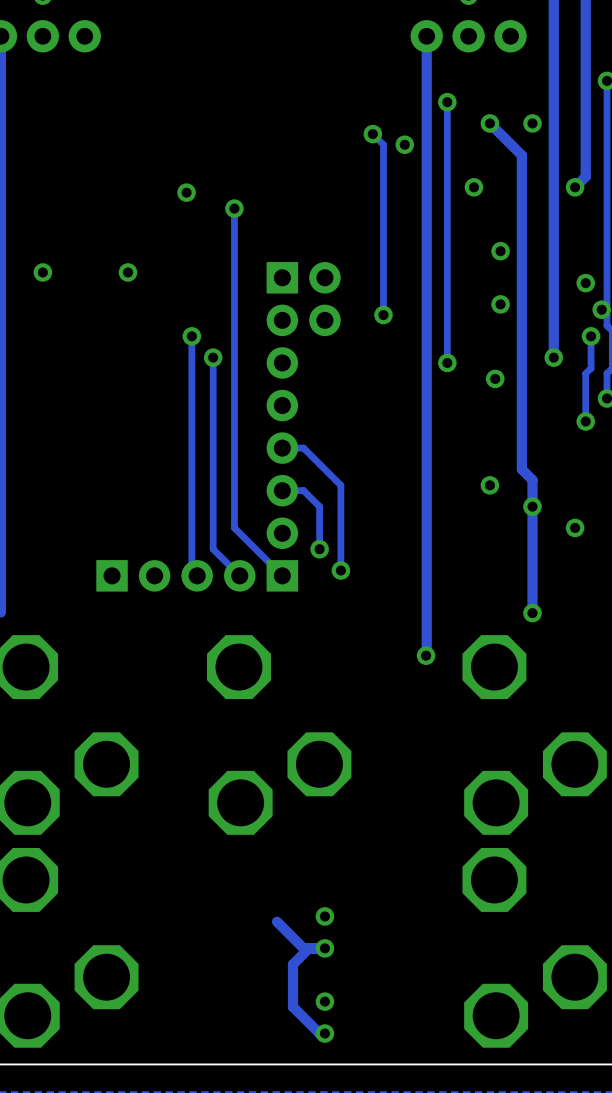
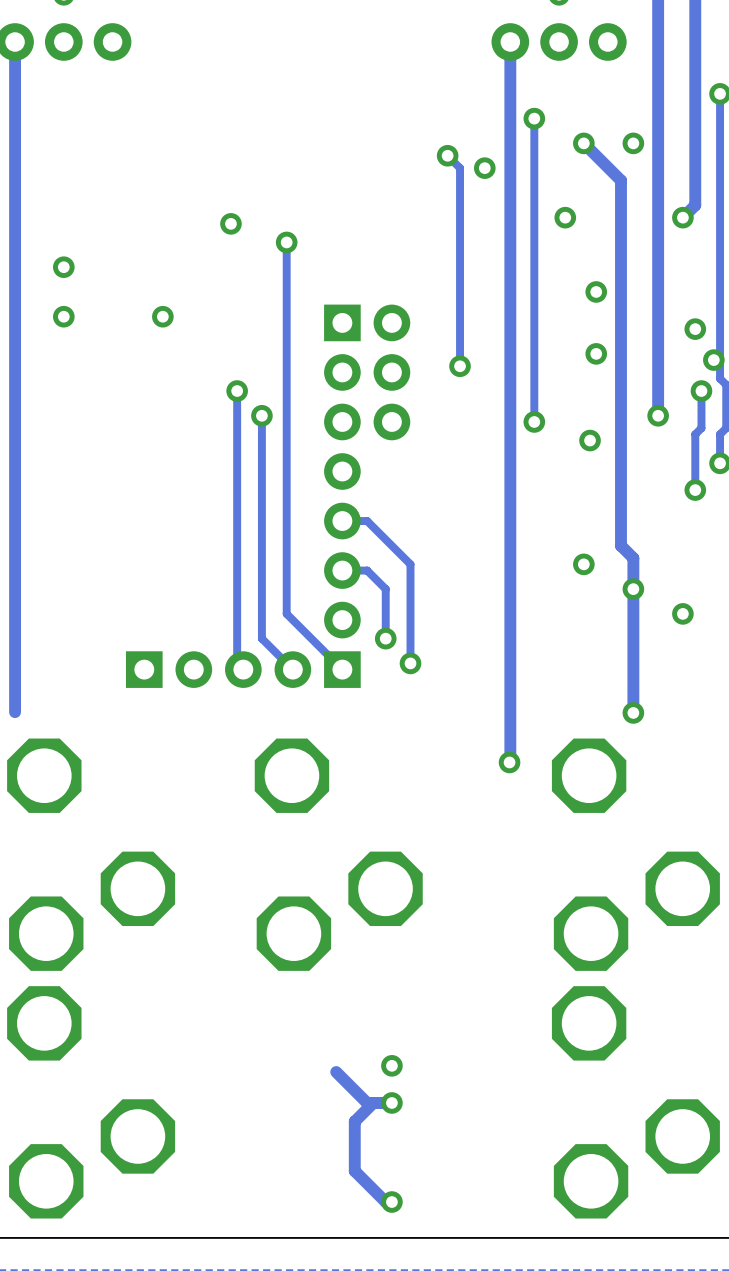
via: none -> (63, 267)
part: none -> (391, 372)
via: (324, 1001) -> none

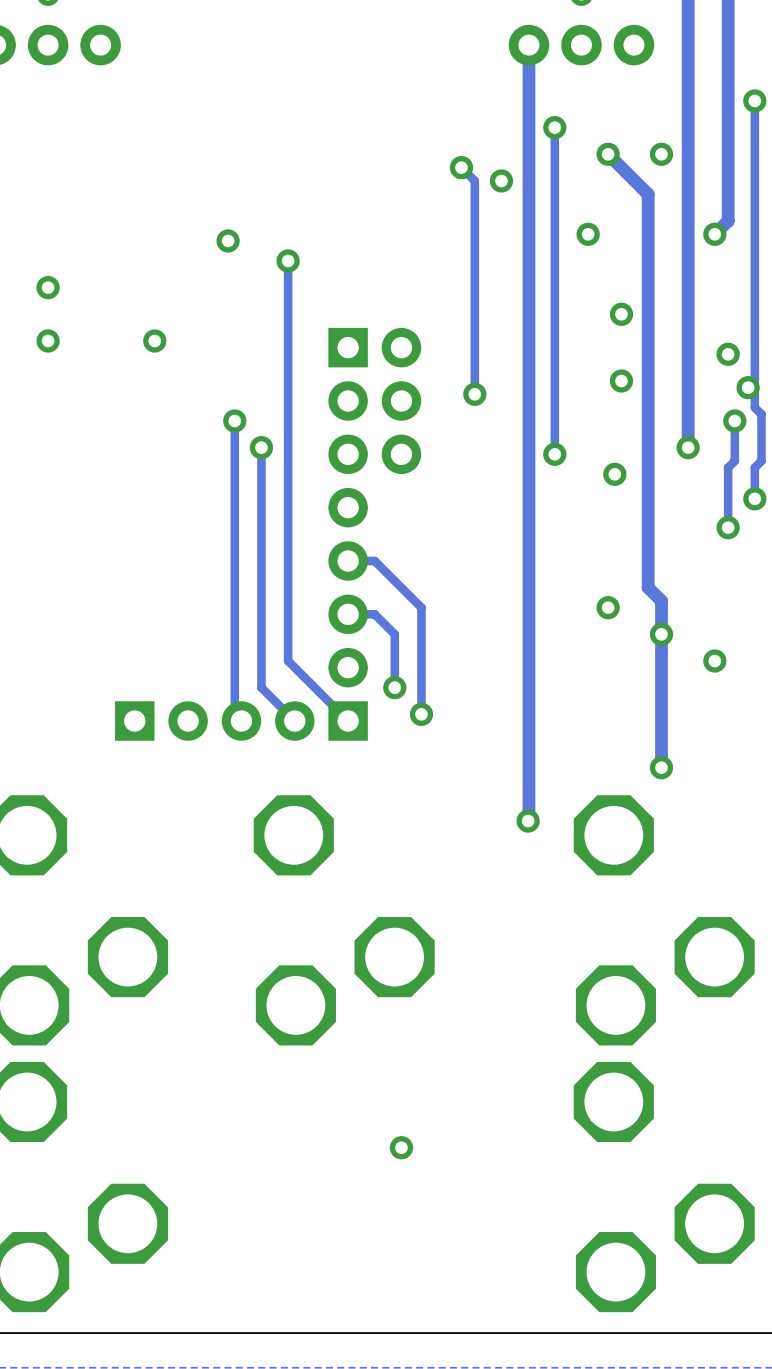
track: (336, 1072) (367, 1102) (391, 1102) -> none
track: (373, 1102) (354, 1121) (354, 1171) (385, 1202) (391, 1202) -> none
via: (391, 1102) -> none
via: (391, 1202) -> none

